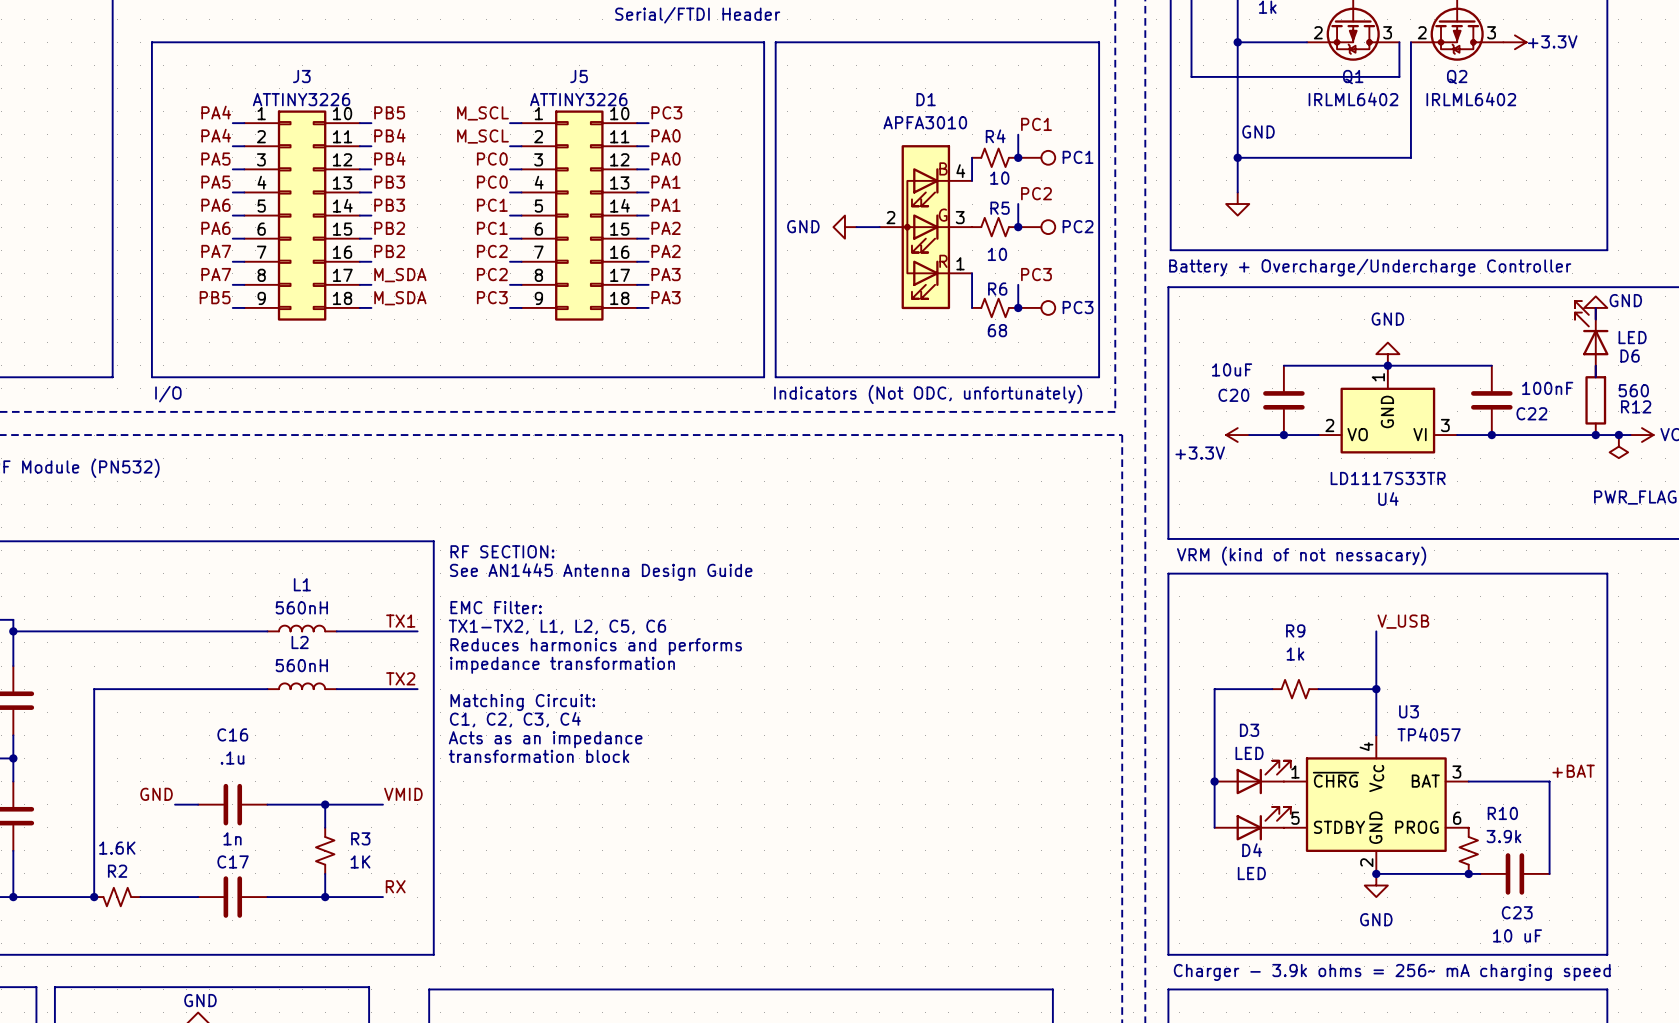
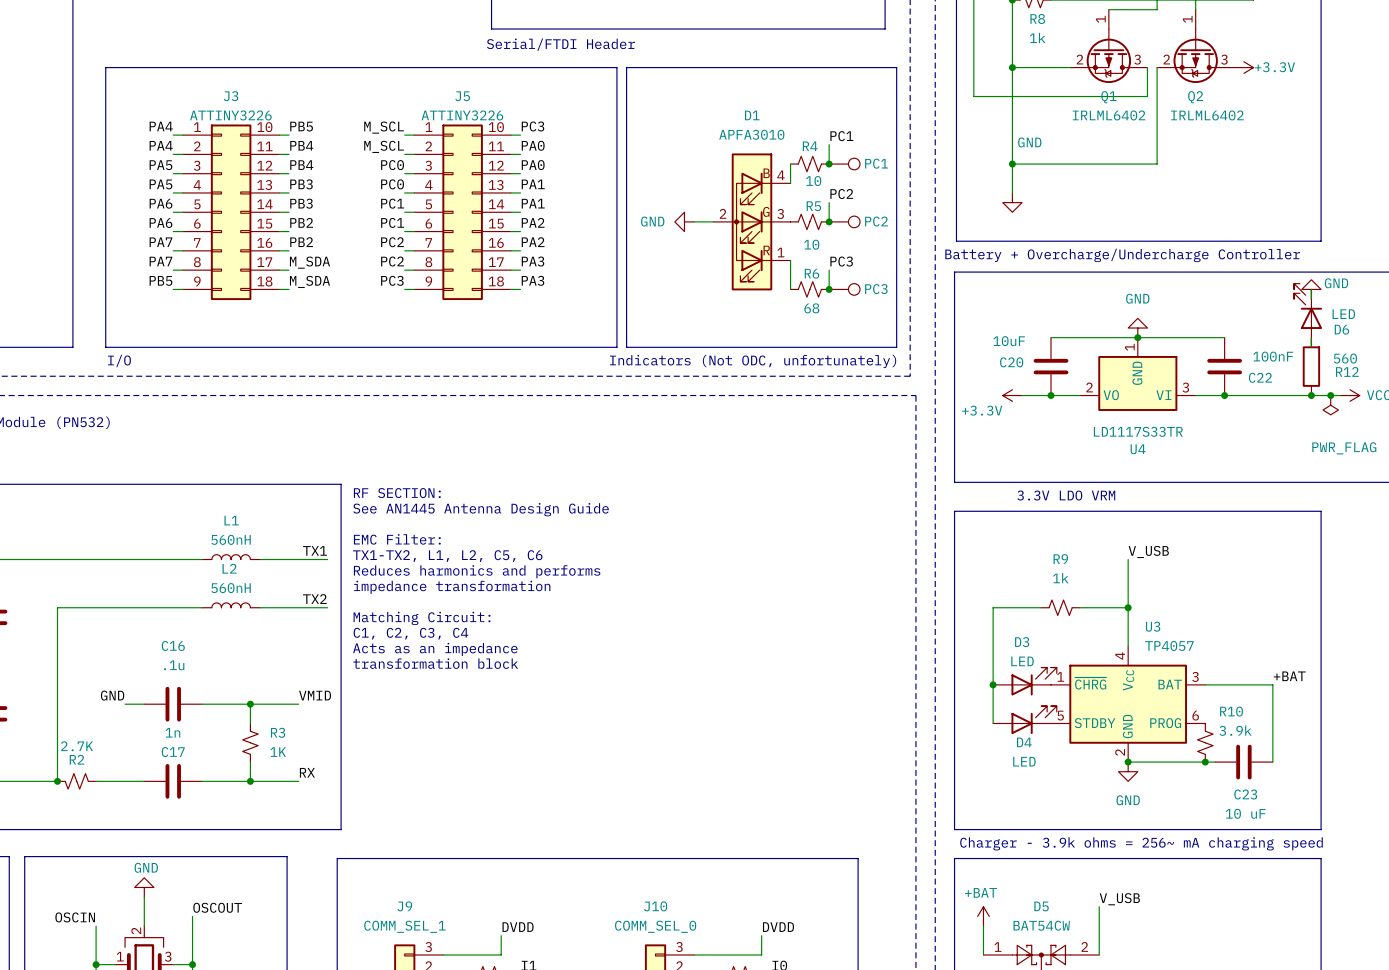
text: VRM (kind of not nessacary) (1301, 556) -> 3.3V LDO VRM (1066, 495)
R2 value: 1.6K (117, 848) -> 2.7K (77, 746)

